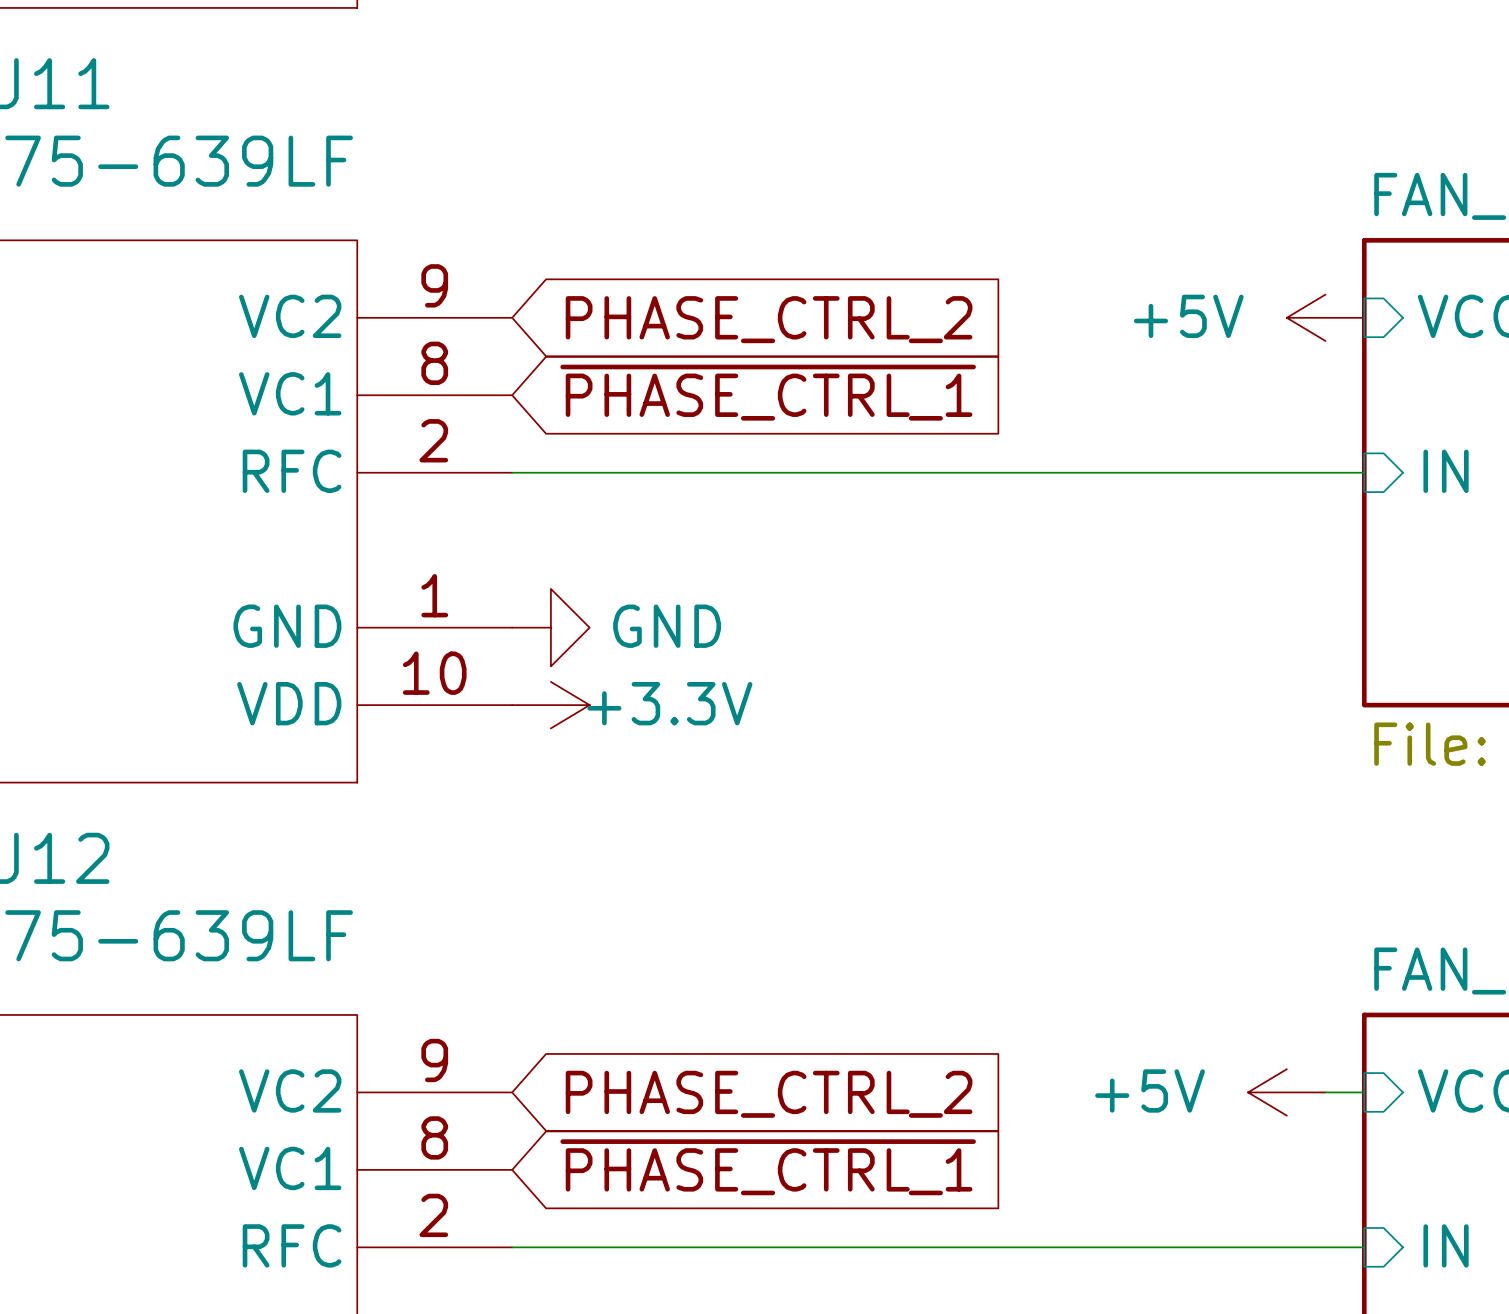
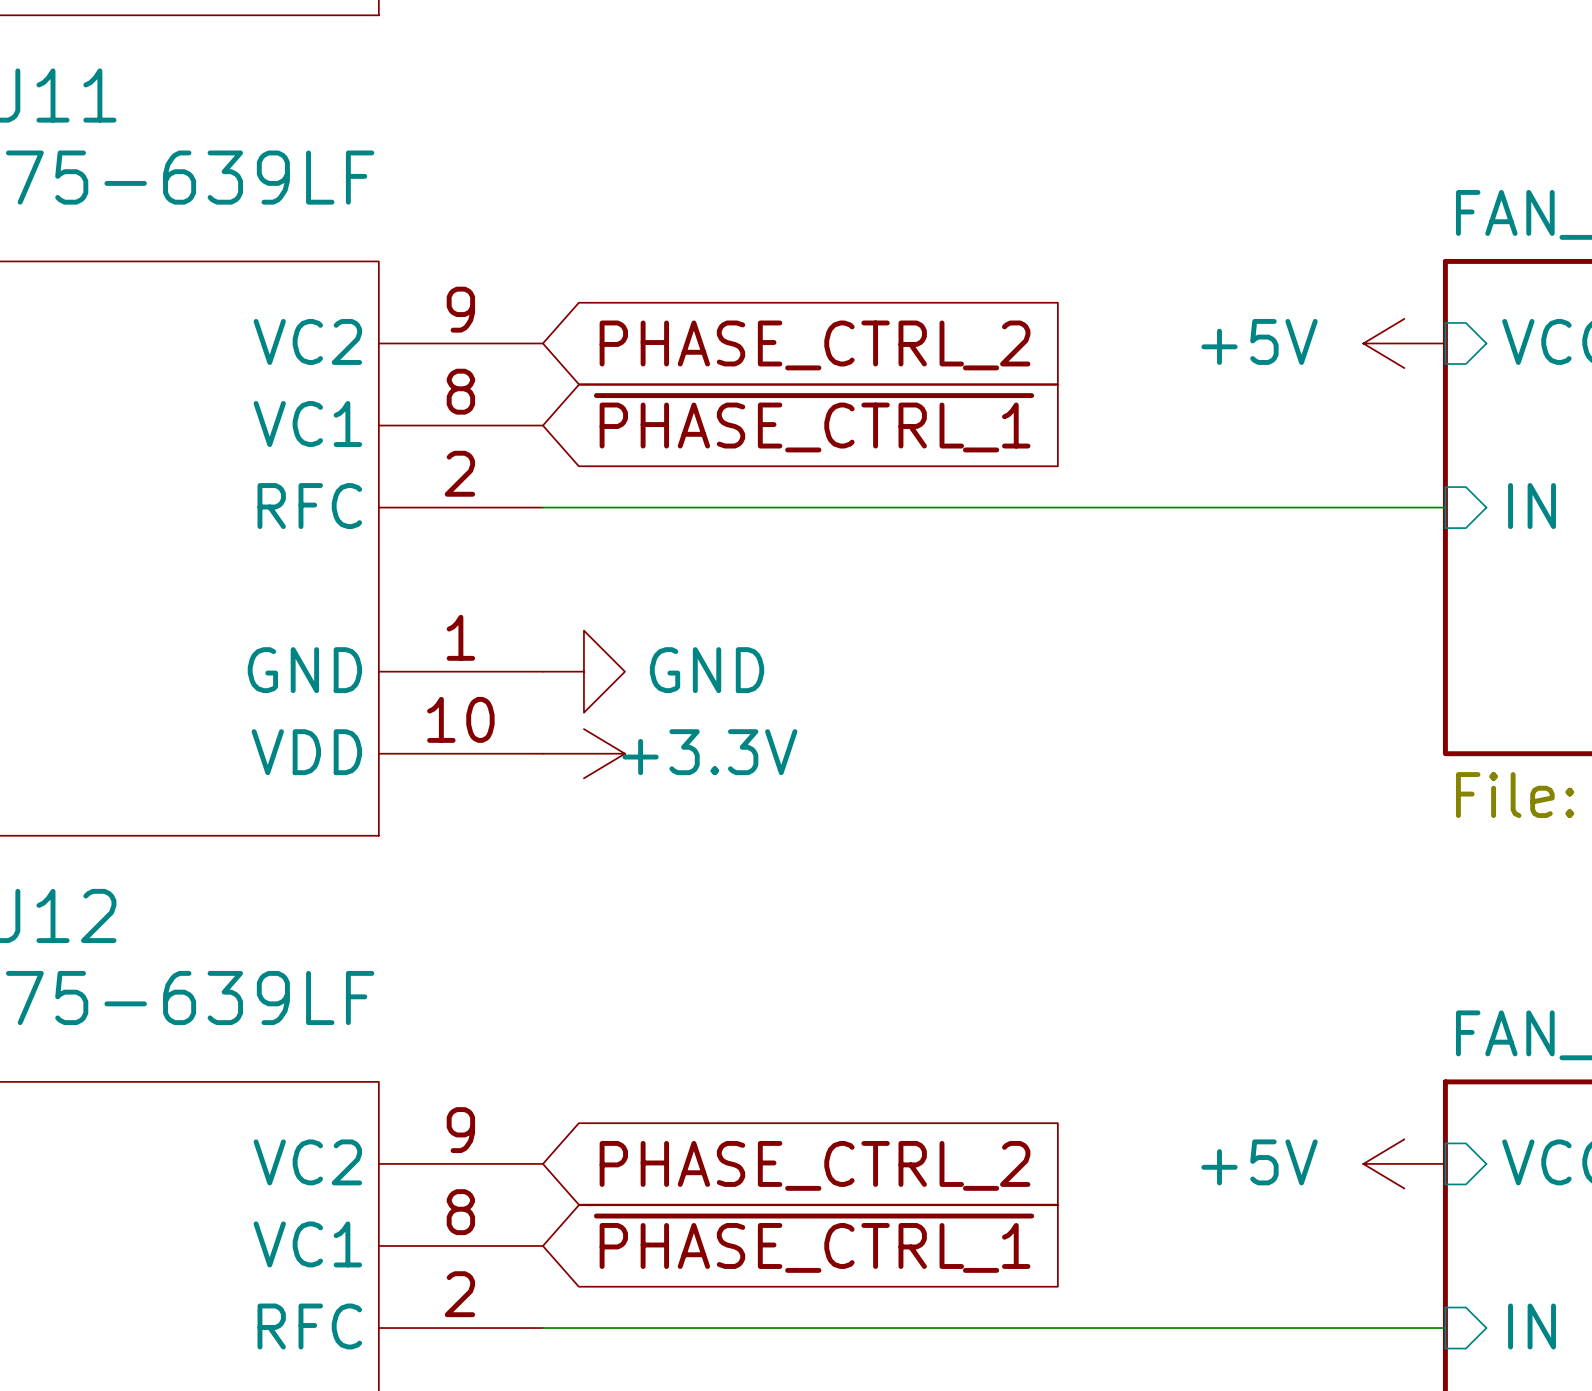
power symbol position: +5V (1286, 1092) -> +5V (1404, 1163)

